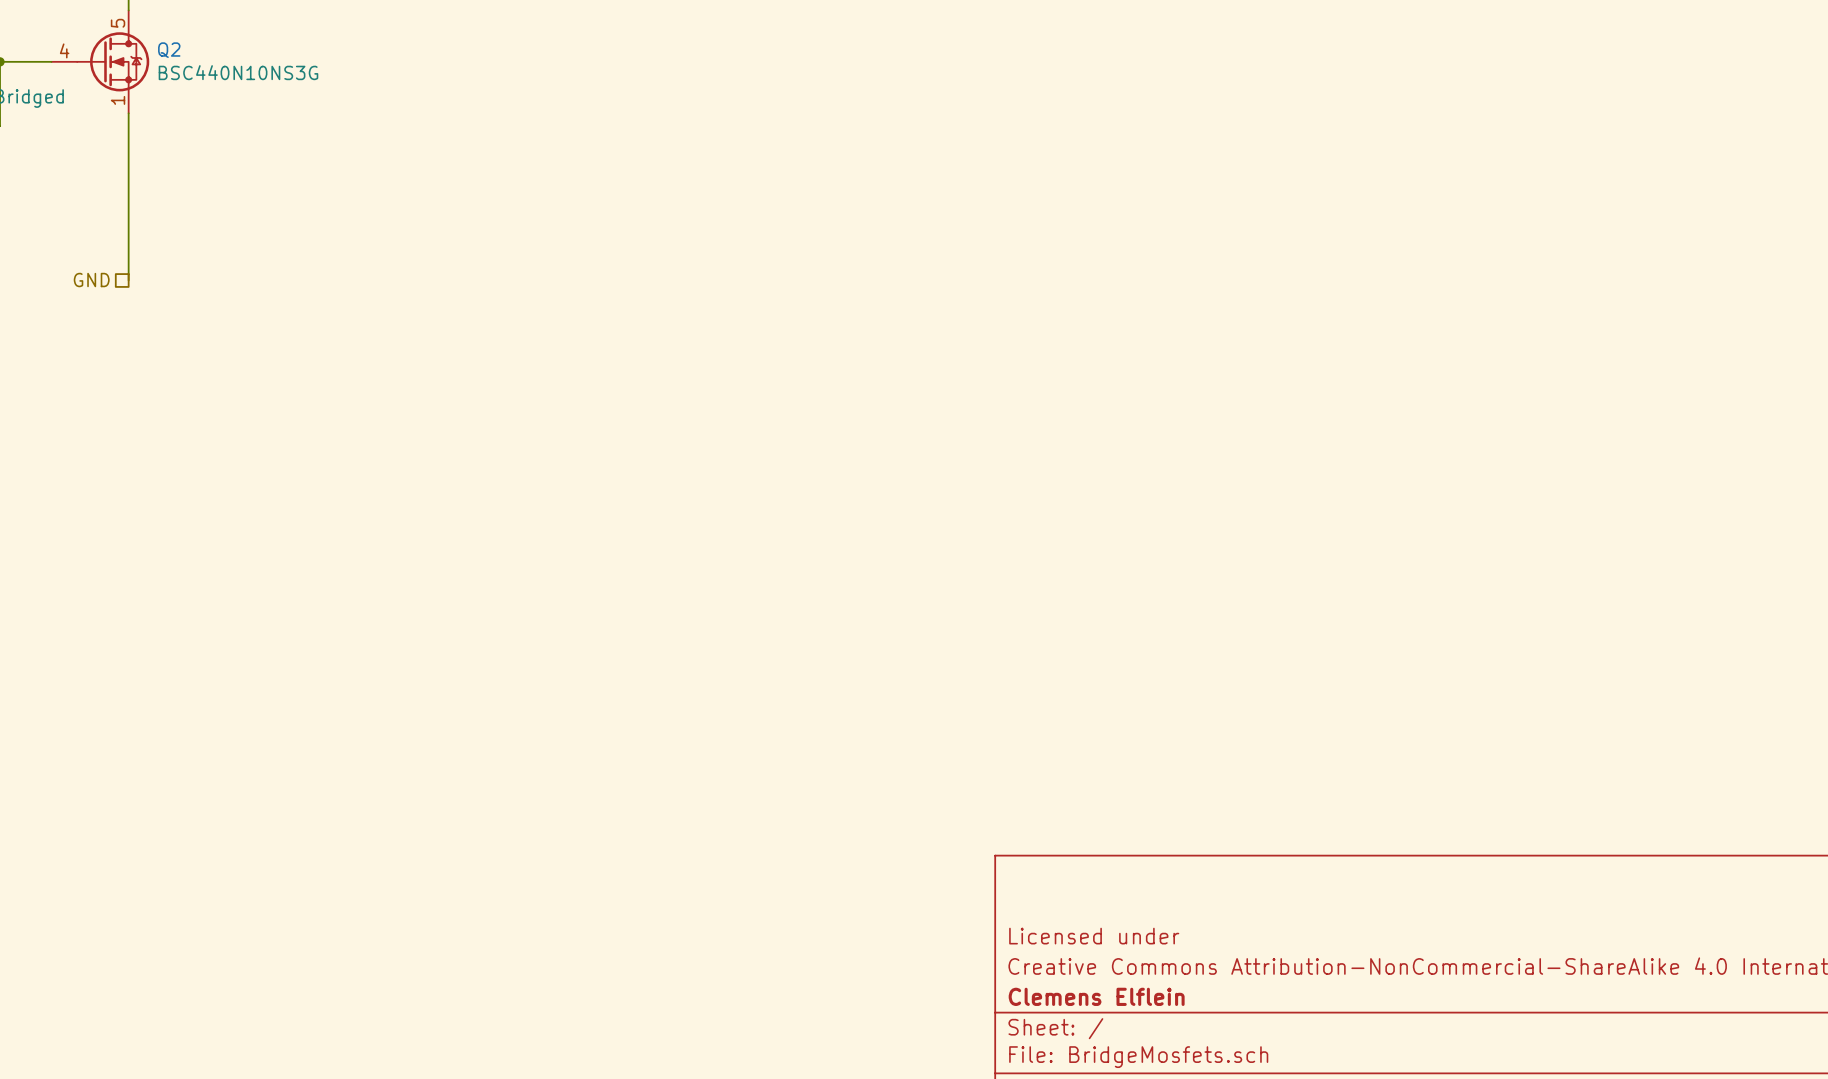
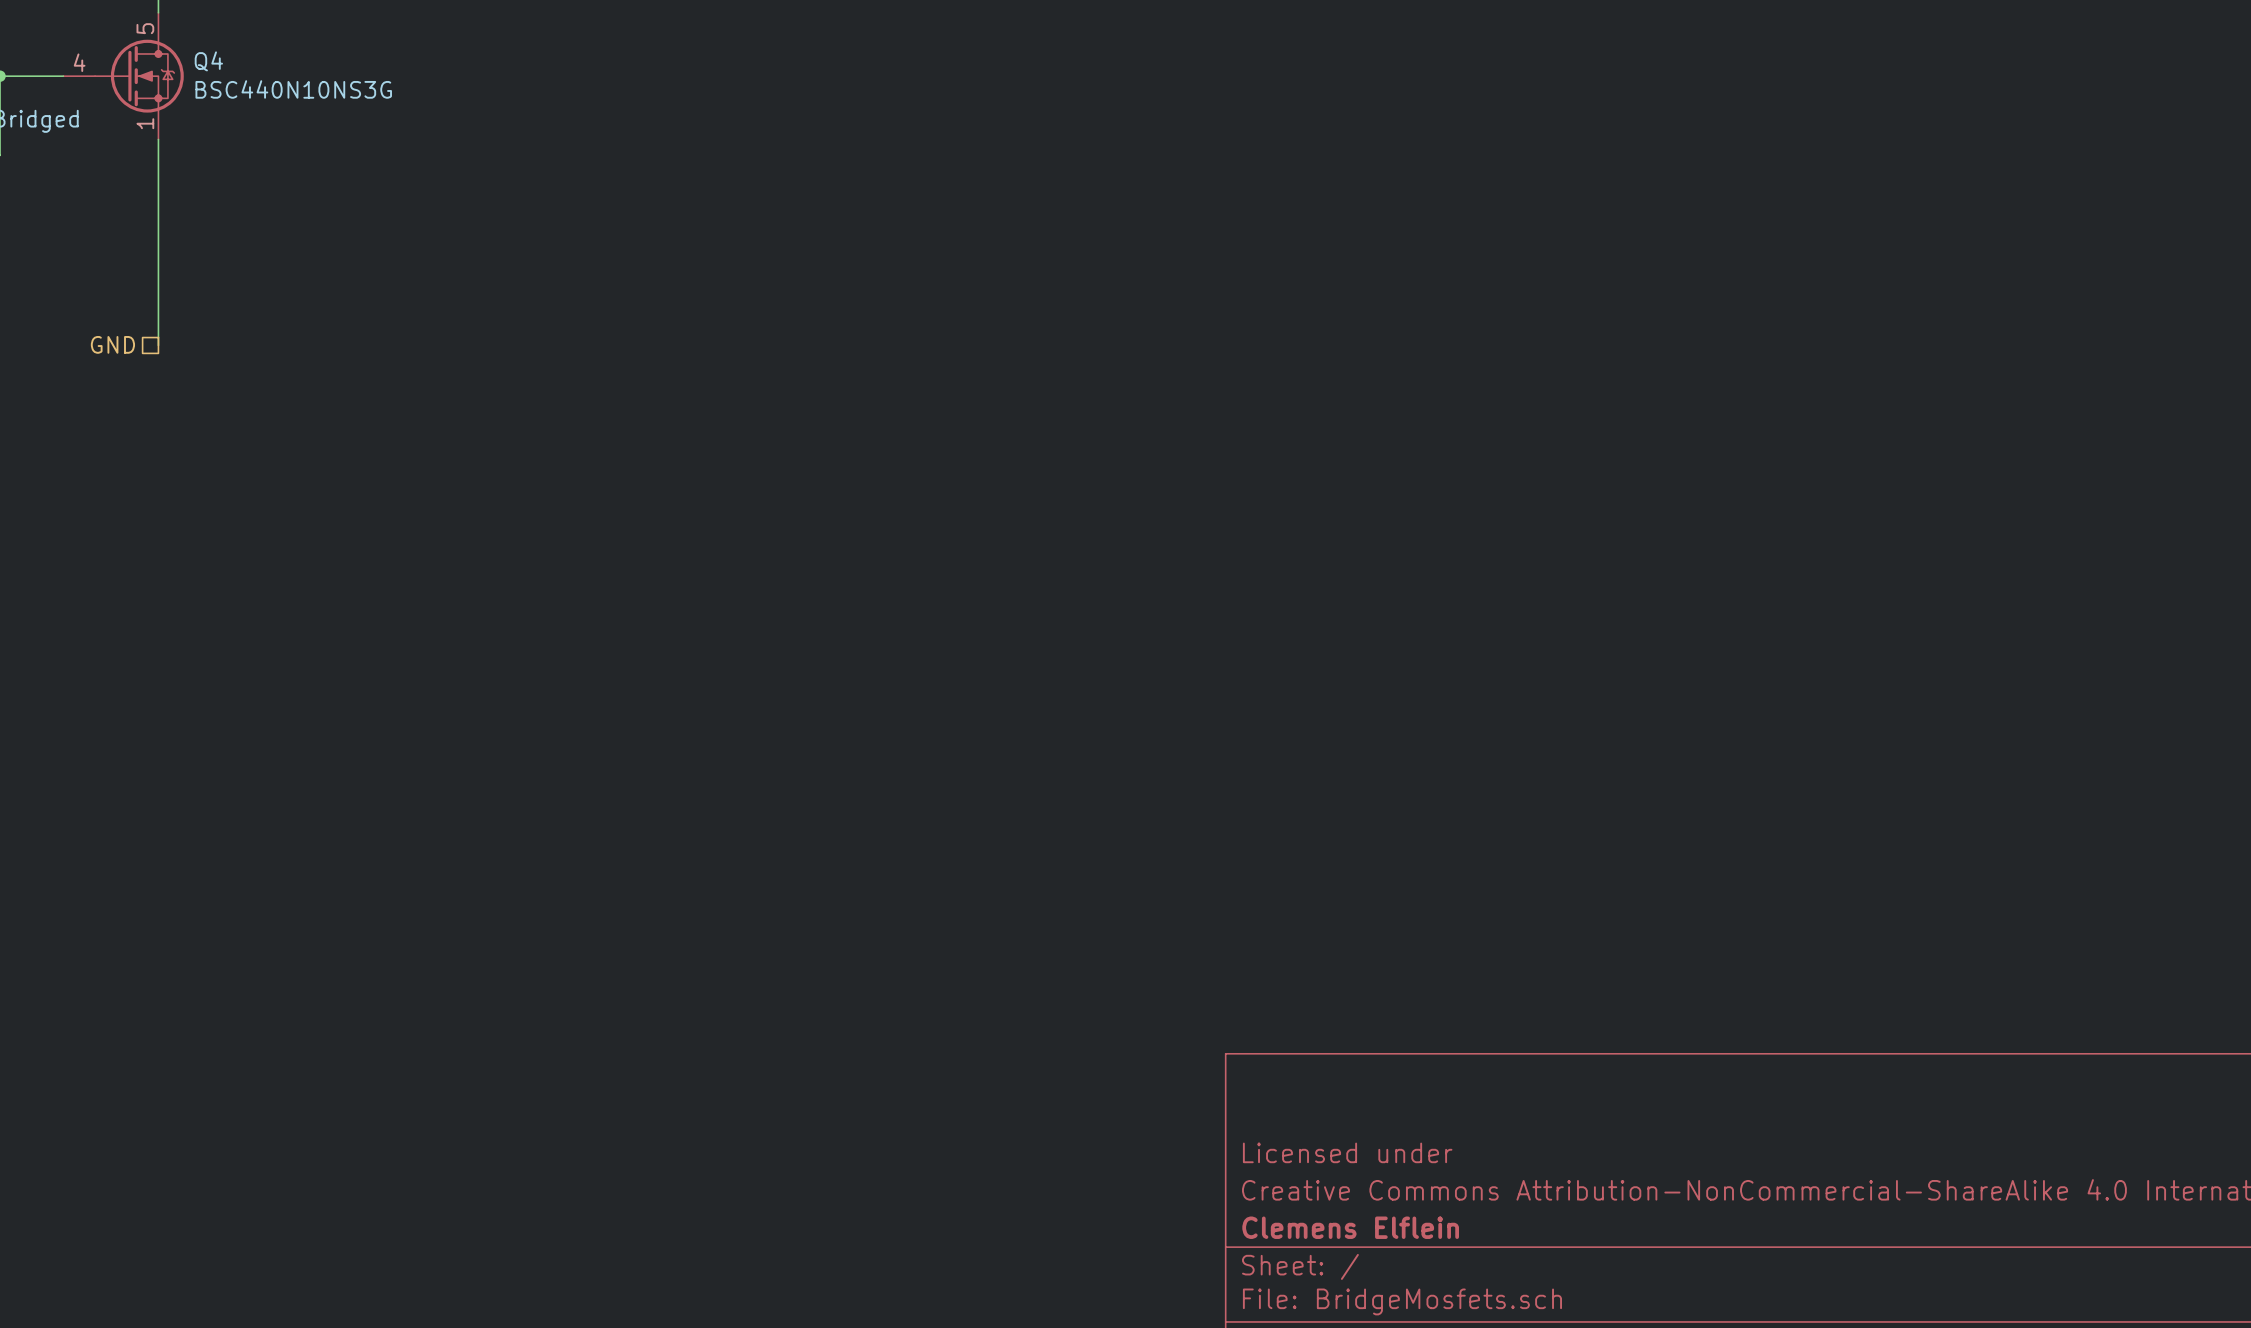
Q2 name: Q2 (169, 50) -> Q4 (208, 61)

